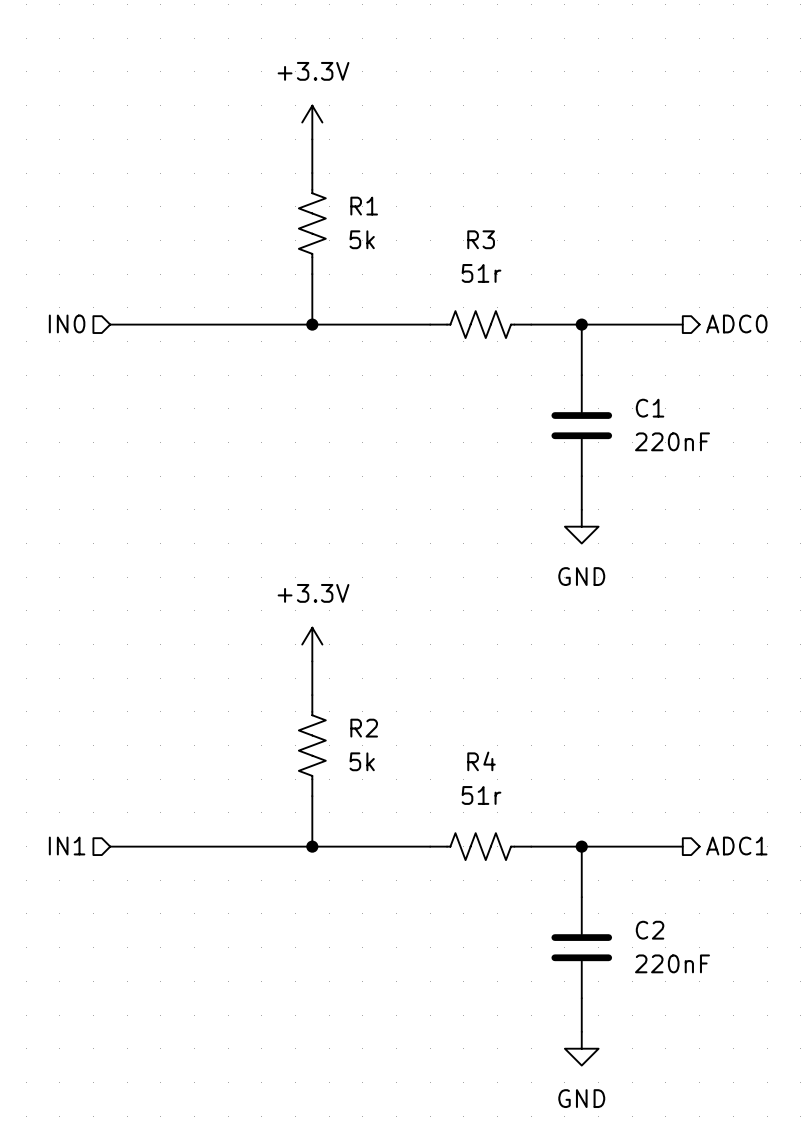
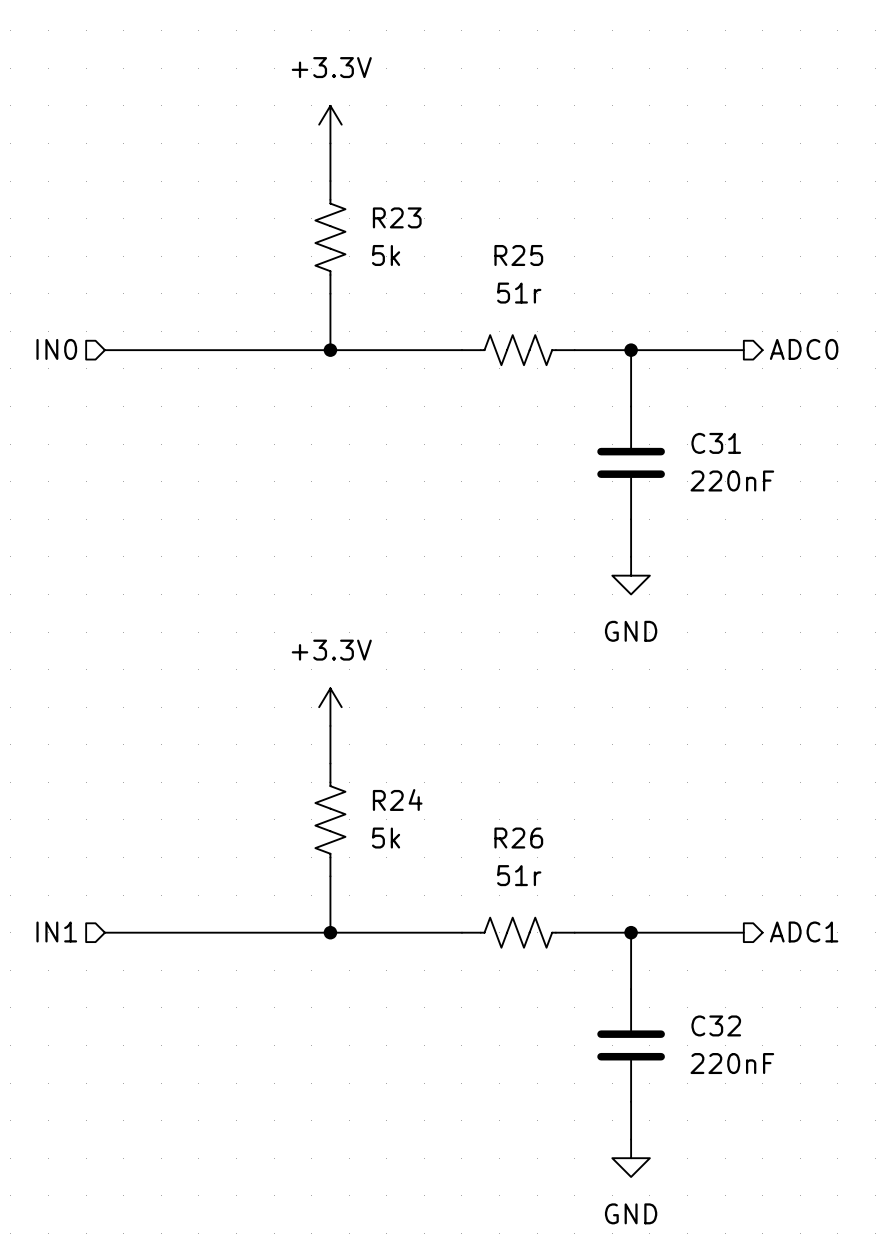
R1 name: R1 (364, 206) -> R23 (397, 217)
R3 name: R3 (481, 239) -> R25 (518, 255)
C1 name: C1 (650, 408) -> C31 (716, 443)
R2 name: R2 (364, 728) -> R24 (397, 800)
R4 name: R4 (481, 761) -> R26 (518, 838)
C2 name: C2 (650, 930) -> C32 (716, 1025)

